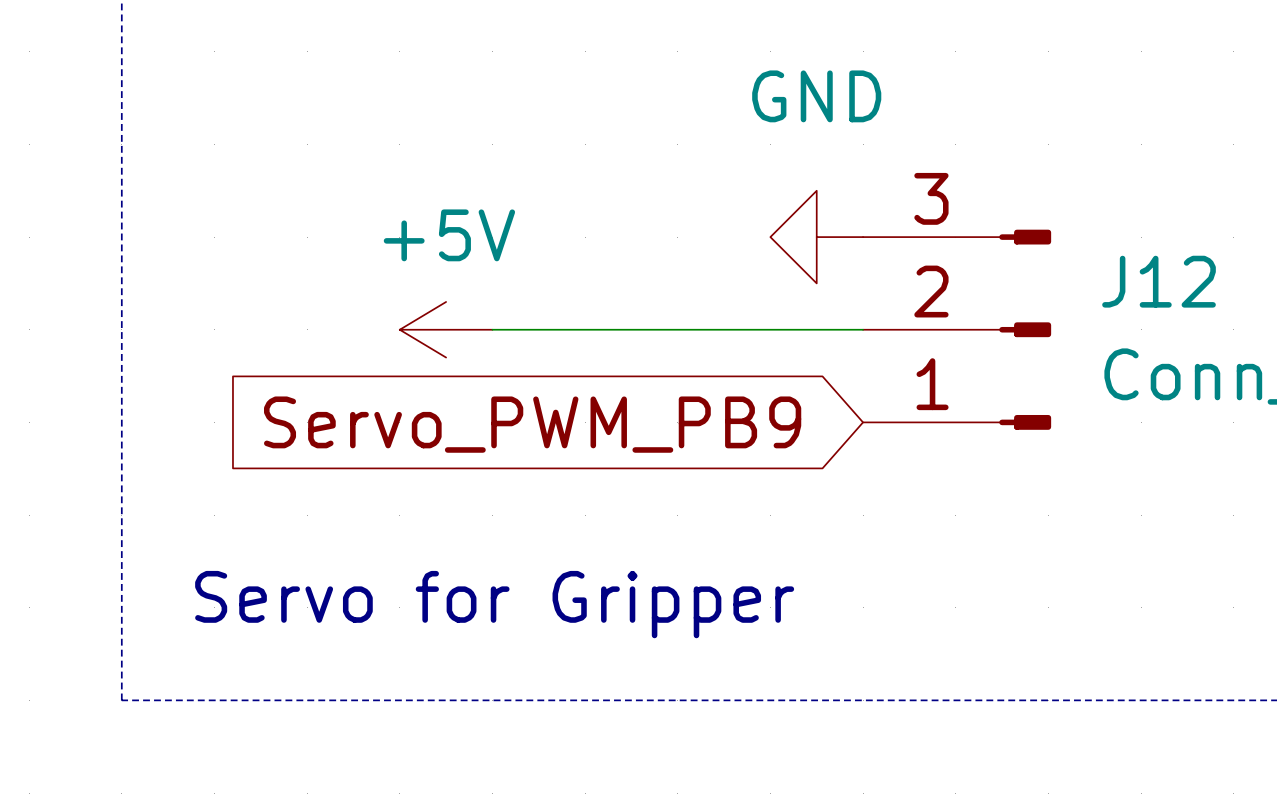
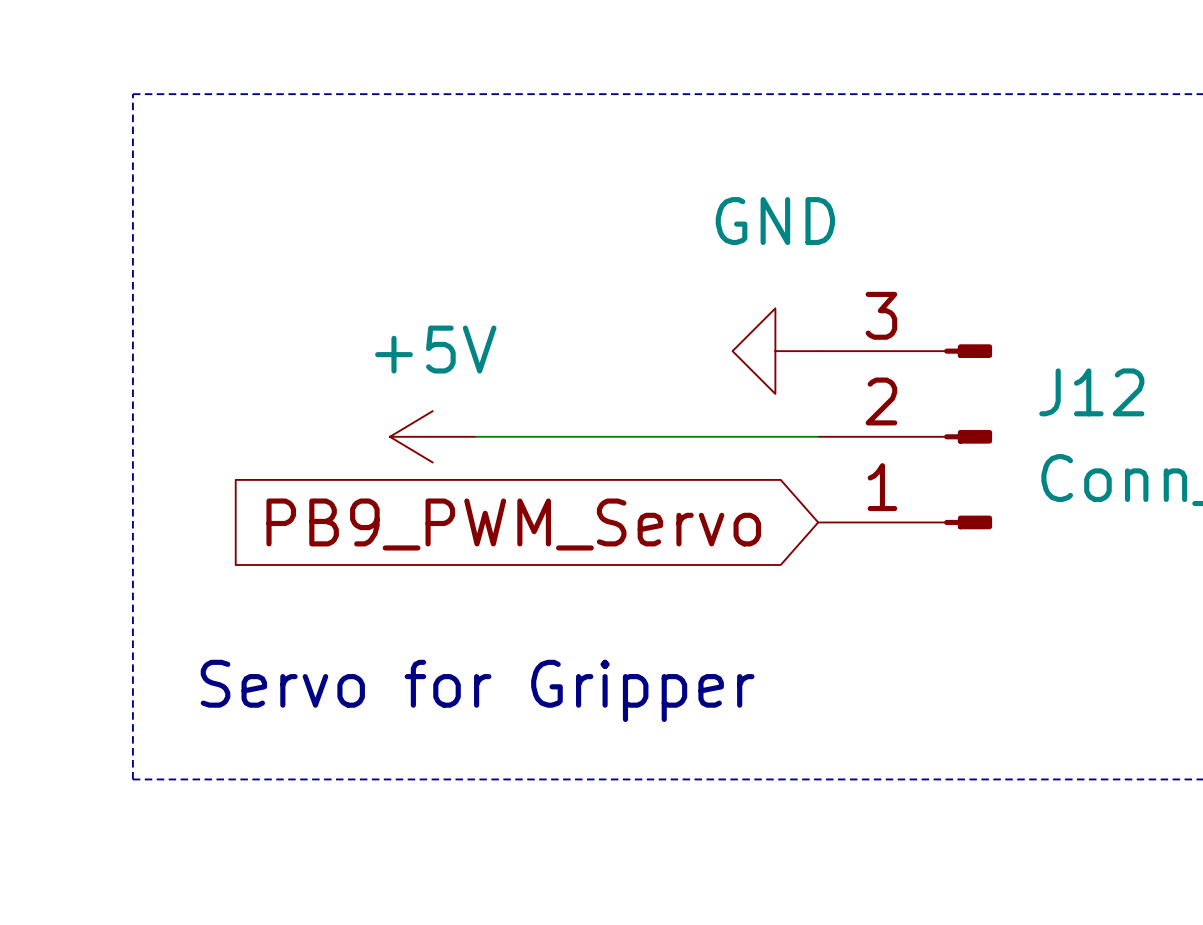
global label: Servo_PWM_PB9 (532, 424) -> PB9_PWM_Servo (513, 524)

